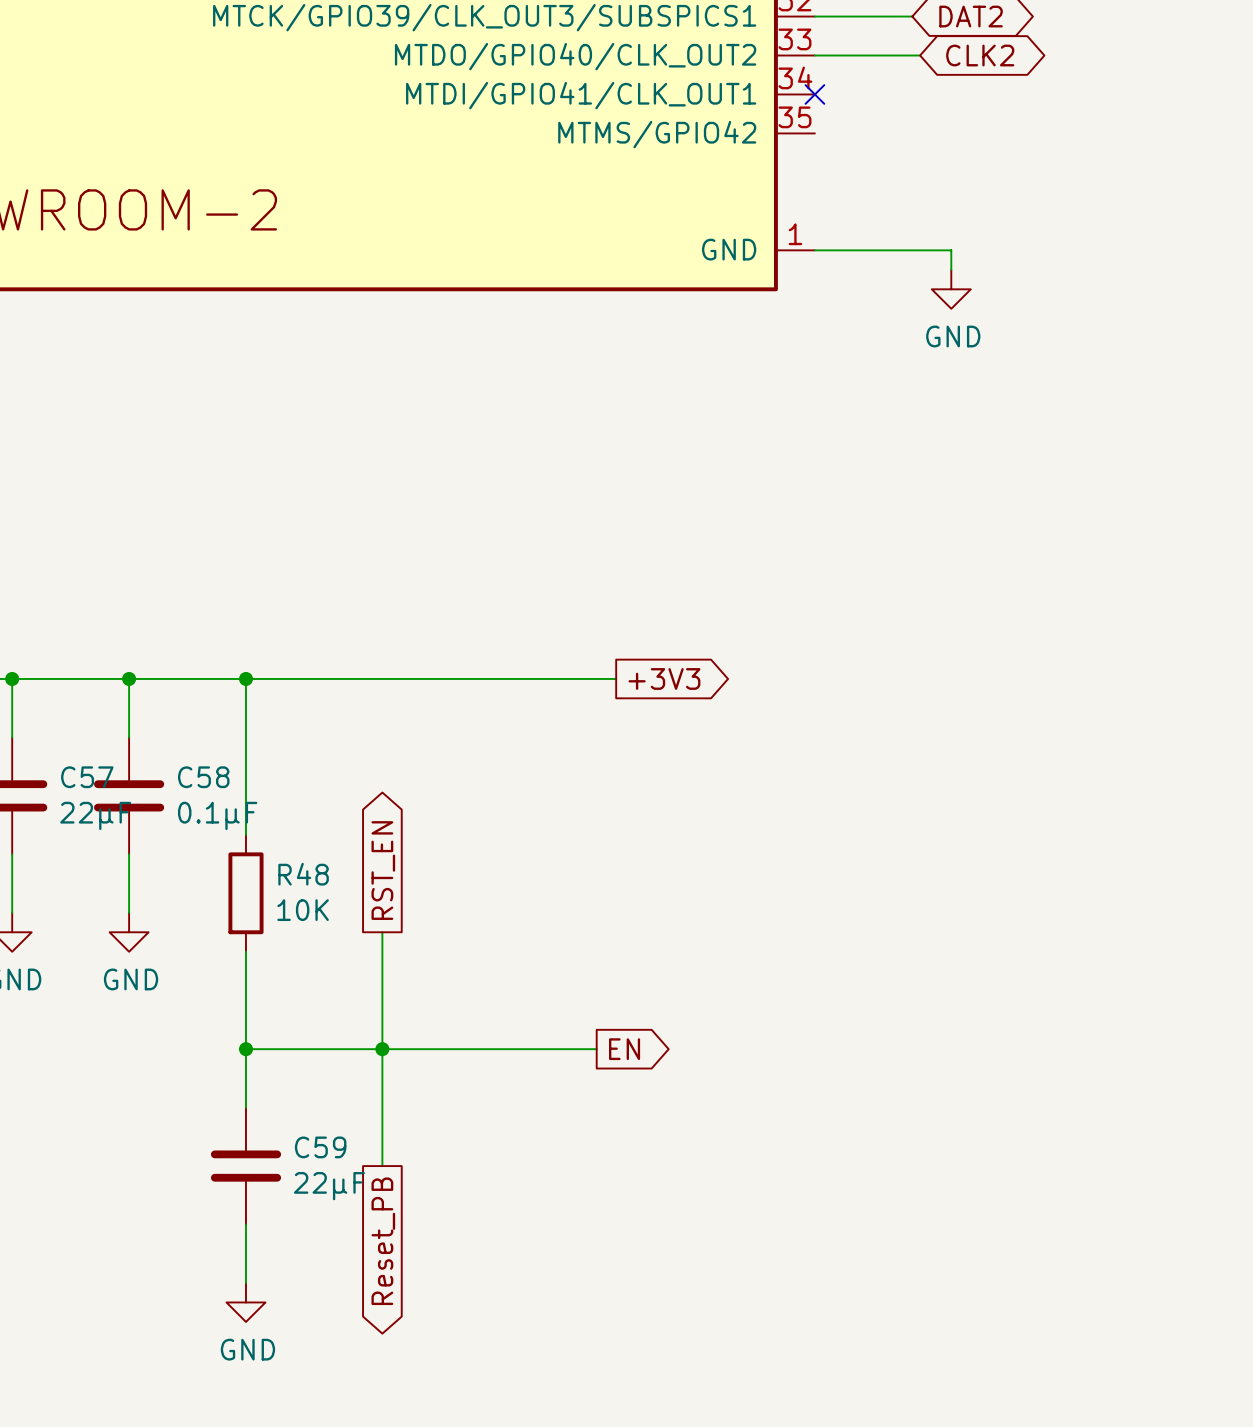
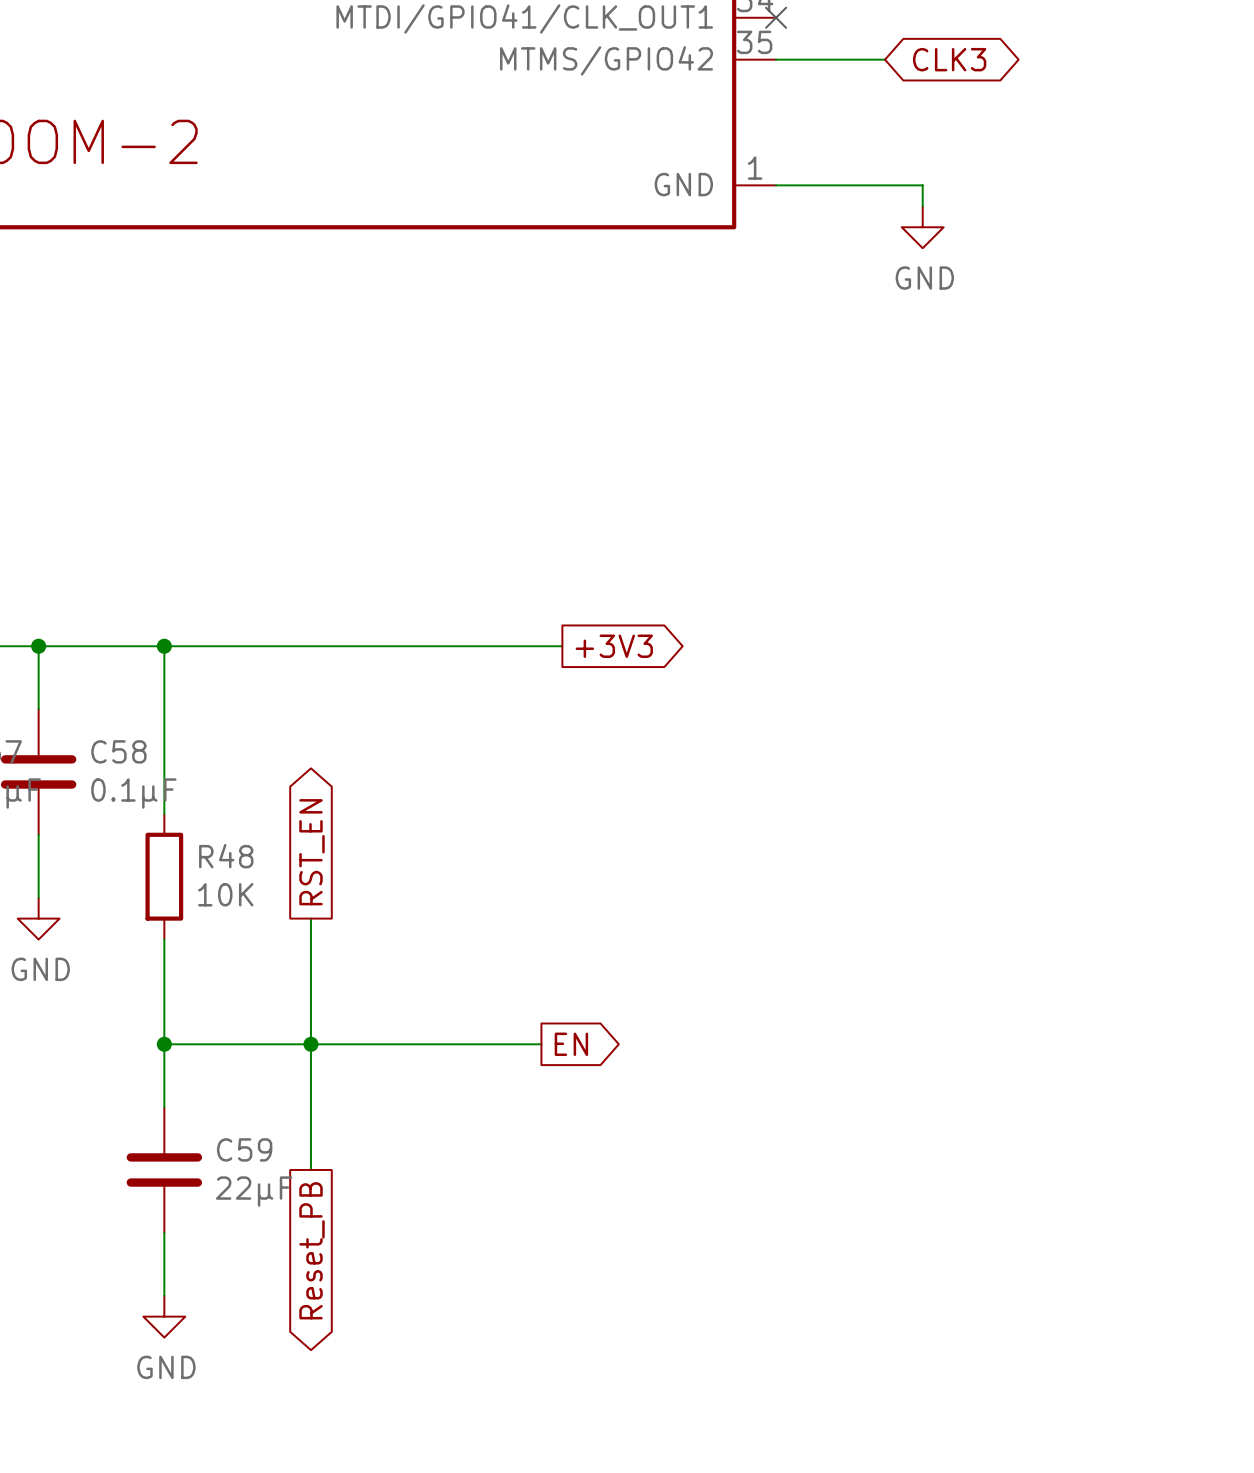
wire: none -> (776, 59) (885, 59)
global label: none -> CLK3 (949, 59)

